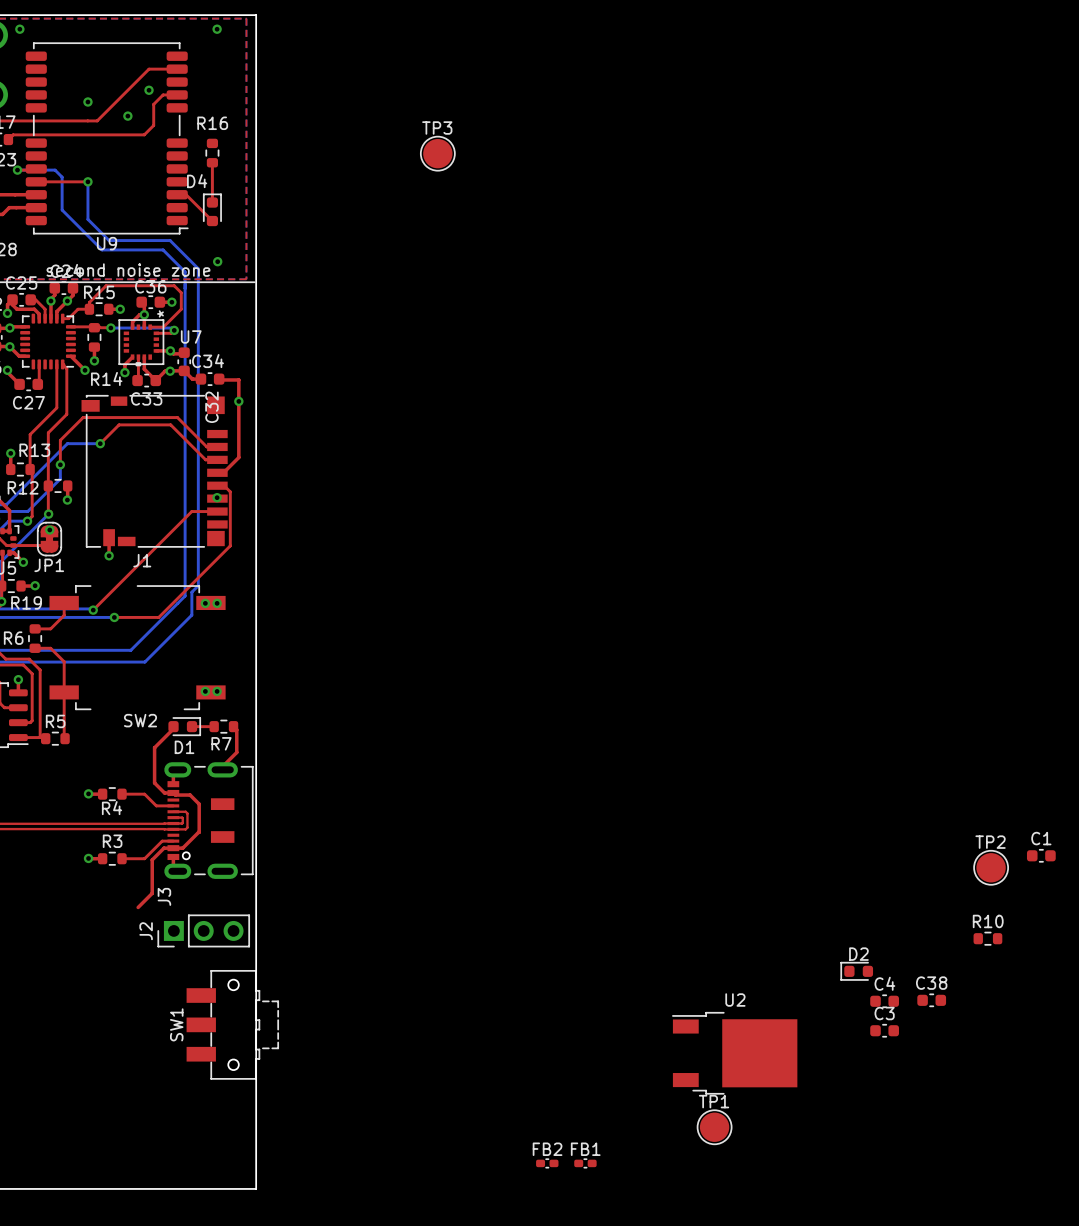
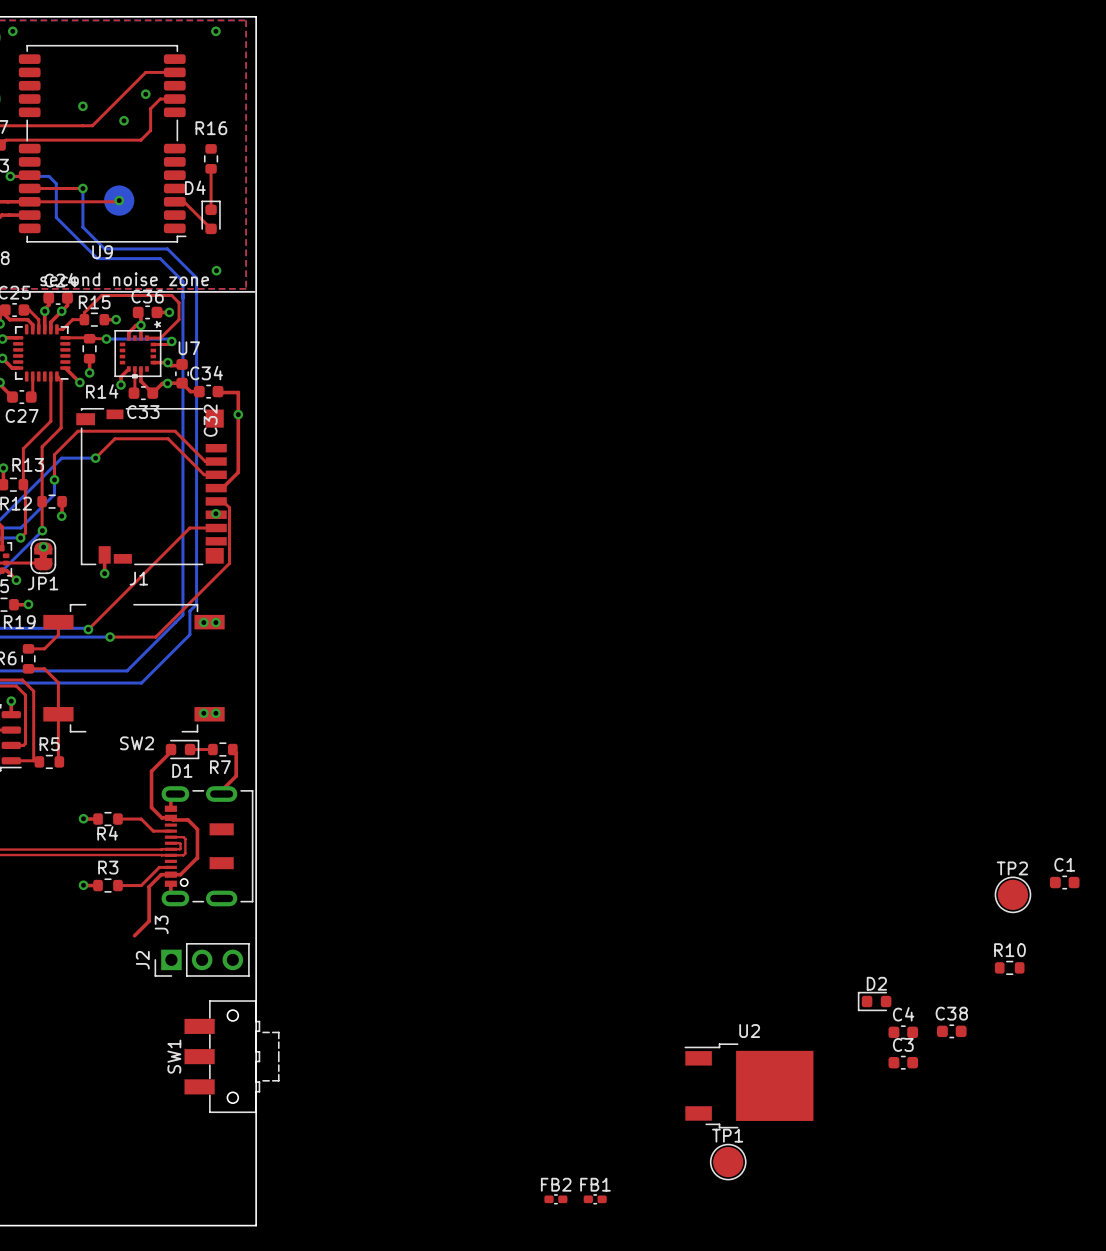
TP3: (437, 153) -> none
top track: none -> (119, 200) (29, 201)
part: none -> (119, 200)
via: none -> (119, 200)

